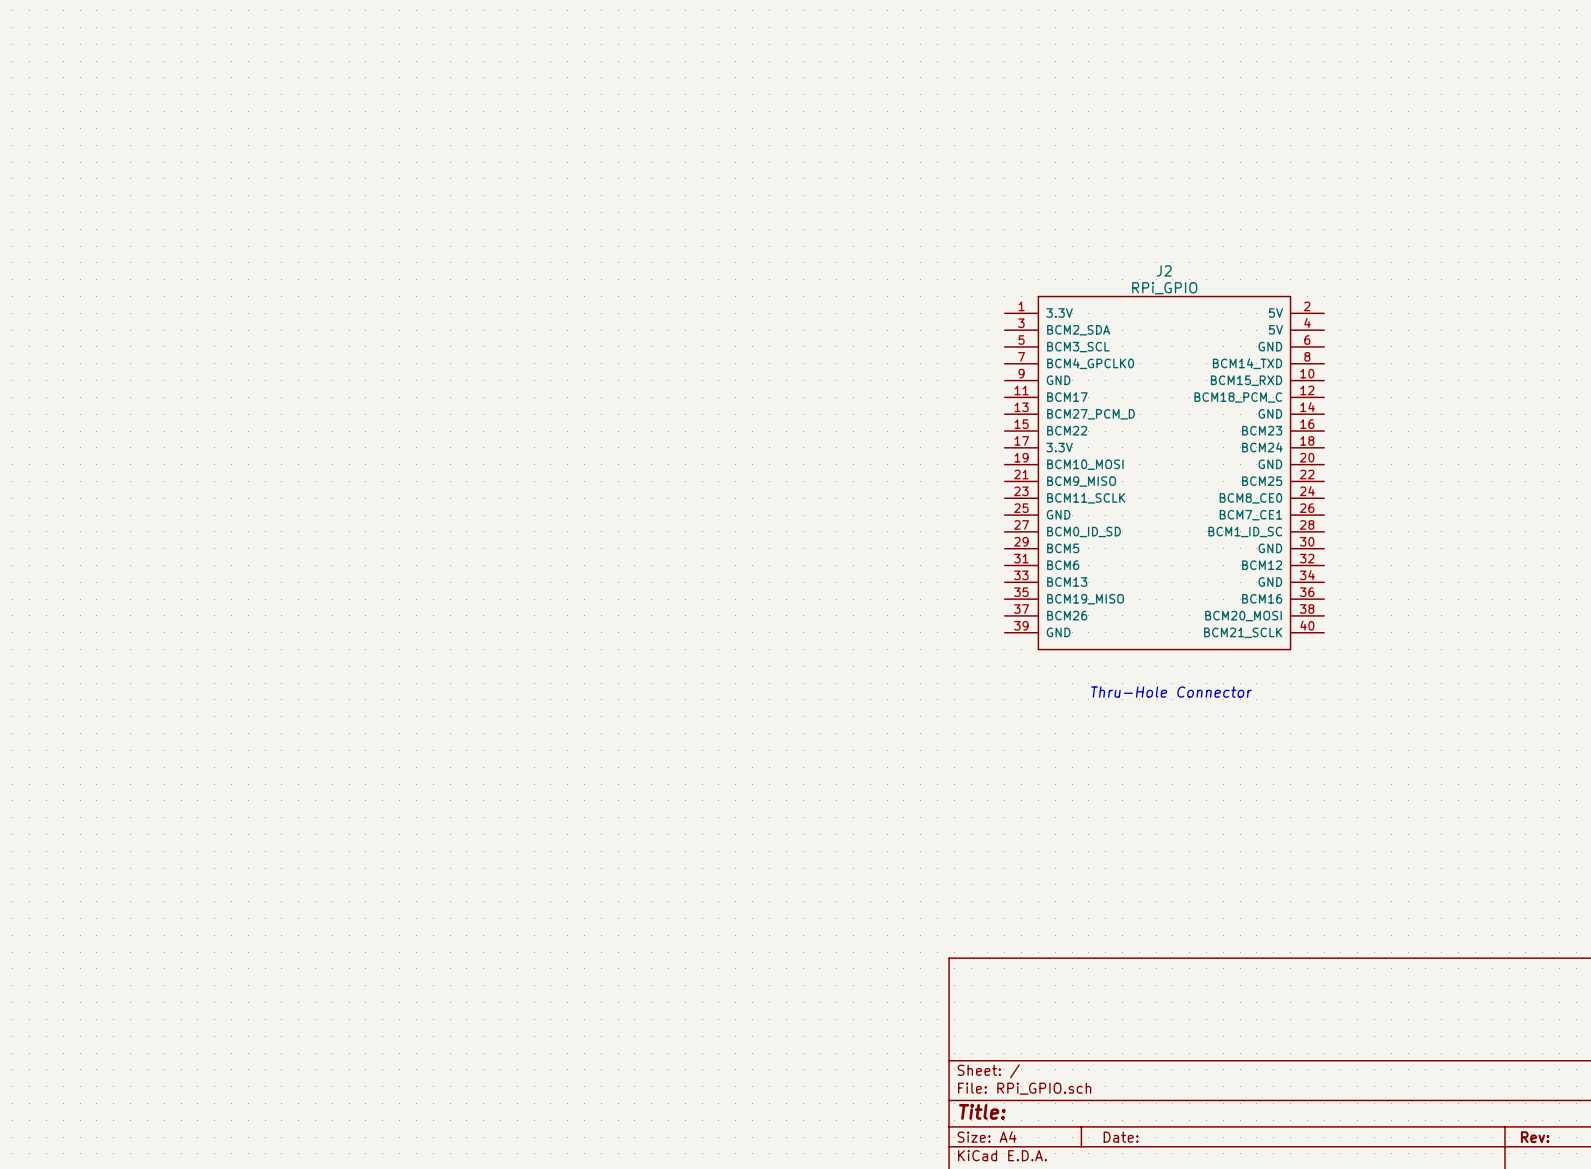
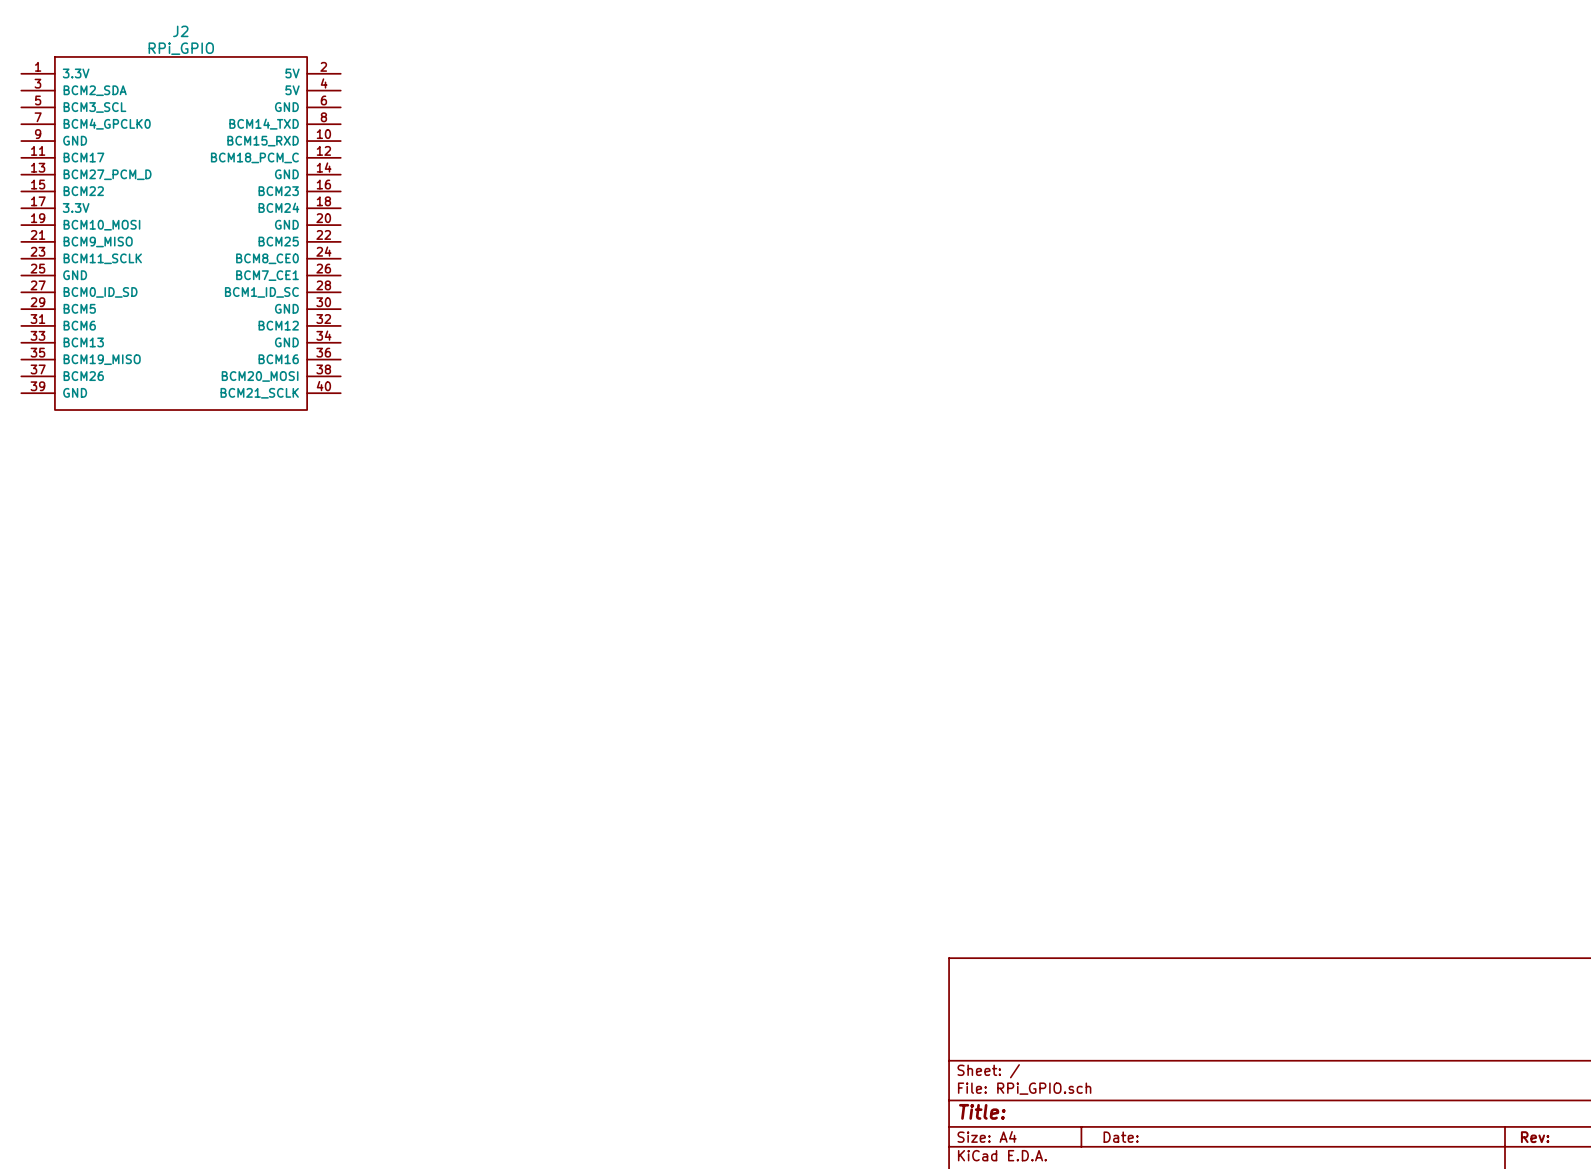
J2 position: (1164, 473) -> (181, 233)
text: Thru-Hole Connector (1171, 692) -> none

